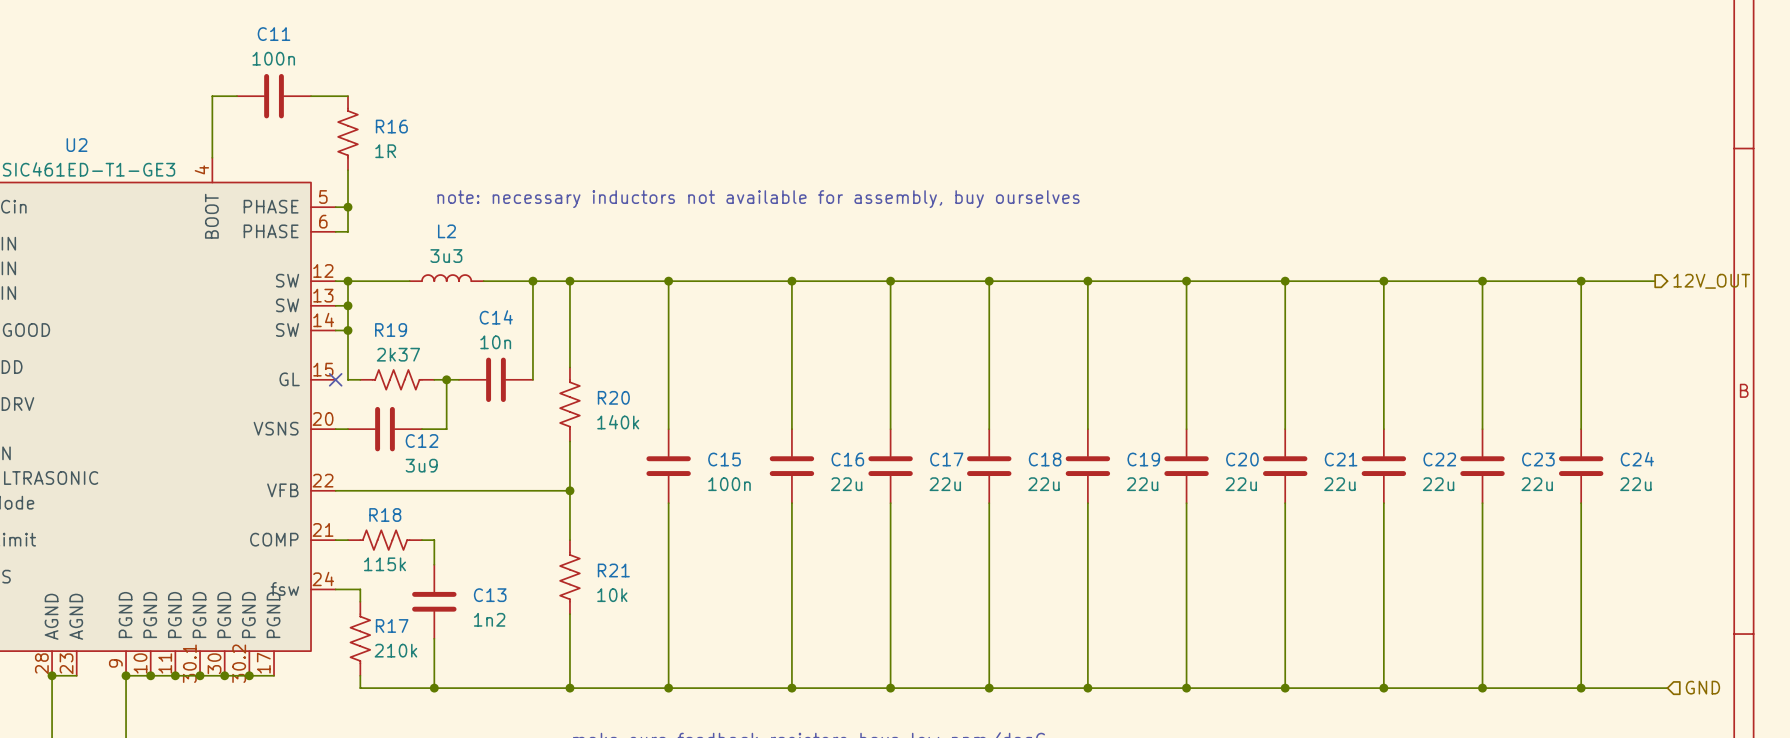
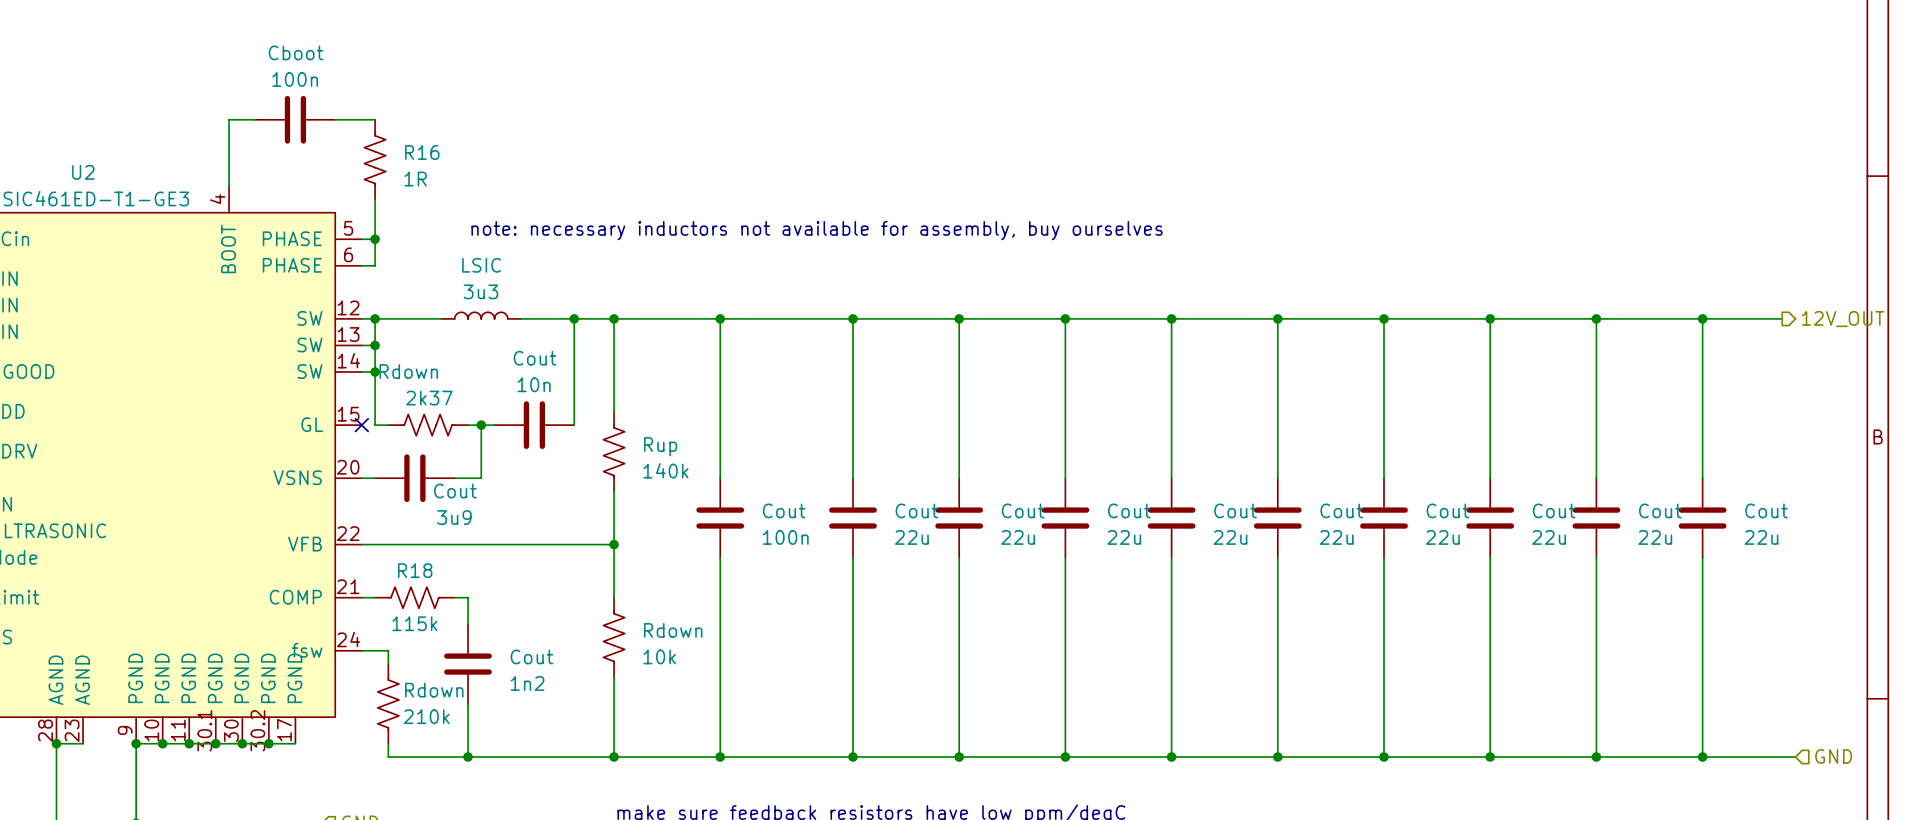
C11 name: C11 (274, 34) -> Cboot (296, 52)
L2 name: L2 (446, 231) -> LSIC (481, 265)
C14 name: C14 (496, 317) -> Cout (535, 358)
R19 name: R19 (391, 330) -> Rdown (408, 371)
R20 name: R20 (613, 397) -> Rup (660, 446)
C12 name: C12 (421, 441) -> Cout (455, 490)
C15 name: C15 (724, 459) -> Cout (784, 510)
C16 name: C16 (847, 459) -> Cout (916, 510)
C17 name: C17 (946, 459) -> Cout (1023, 510)
C18 name: C18 (1045, 459) -> Cout (1129, 510)
C19 name: C19 (1143, 459) -> Cout (1235, 510)
C20 name: C20 (1242, 459) -> Cout (1341, 510)
C21 name: C21 (1341, 459) -> Cout (1447, 510)
C22 name: C22 (1439, 459) -> Cout (1554, 510)
C23 name: C23 (1538, 459) -> Cout (1660, 510)
C24 name: C24 (1637, 459) -> Cout (1766, 510)
R21 name: R21 (613, 570) -> Rdown (673, 630)
C13 name: C13 (490, 595) -> Cout (531, 656)
R17 name: R17 (392, 625) -> Rdown (434, 690)

